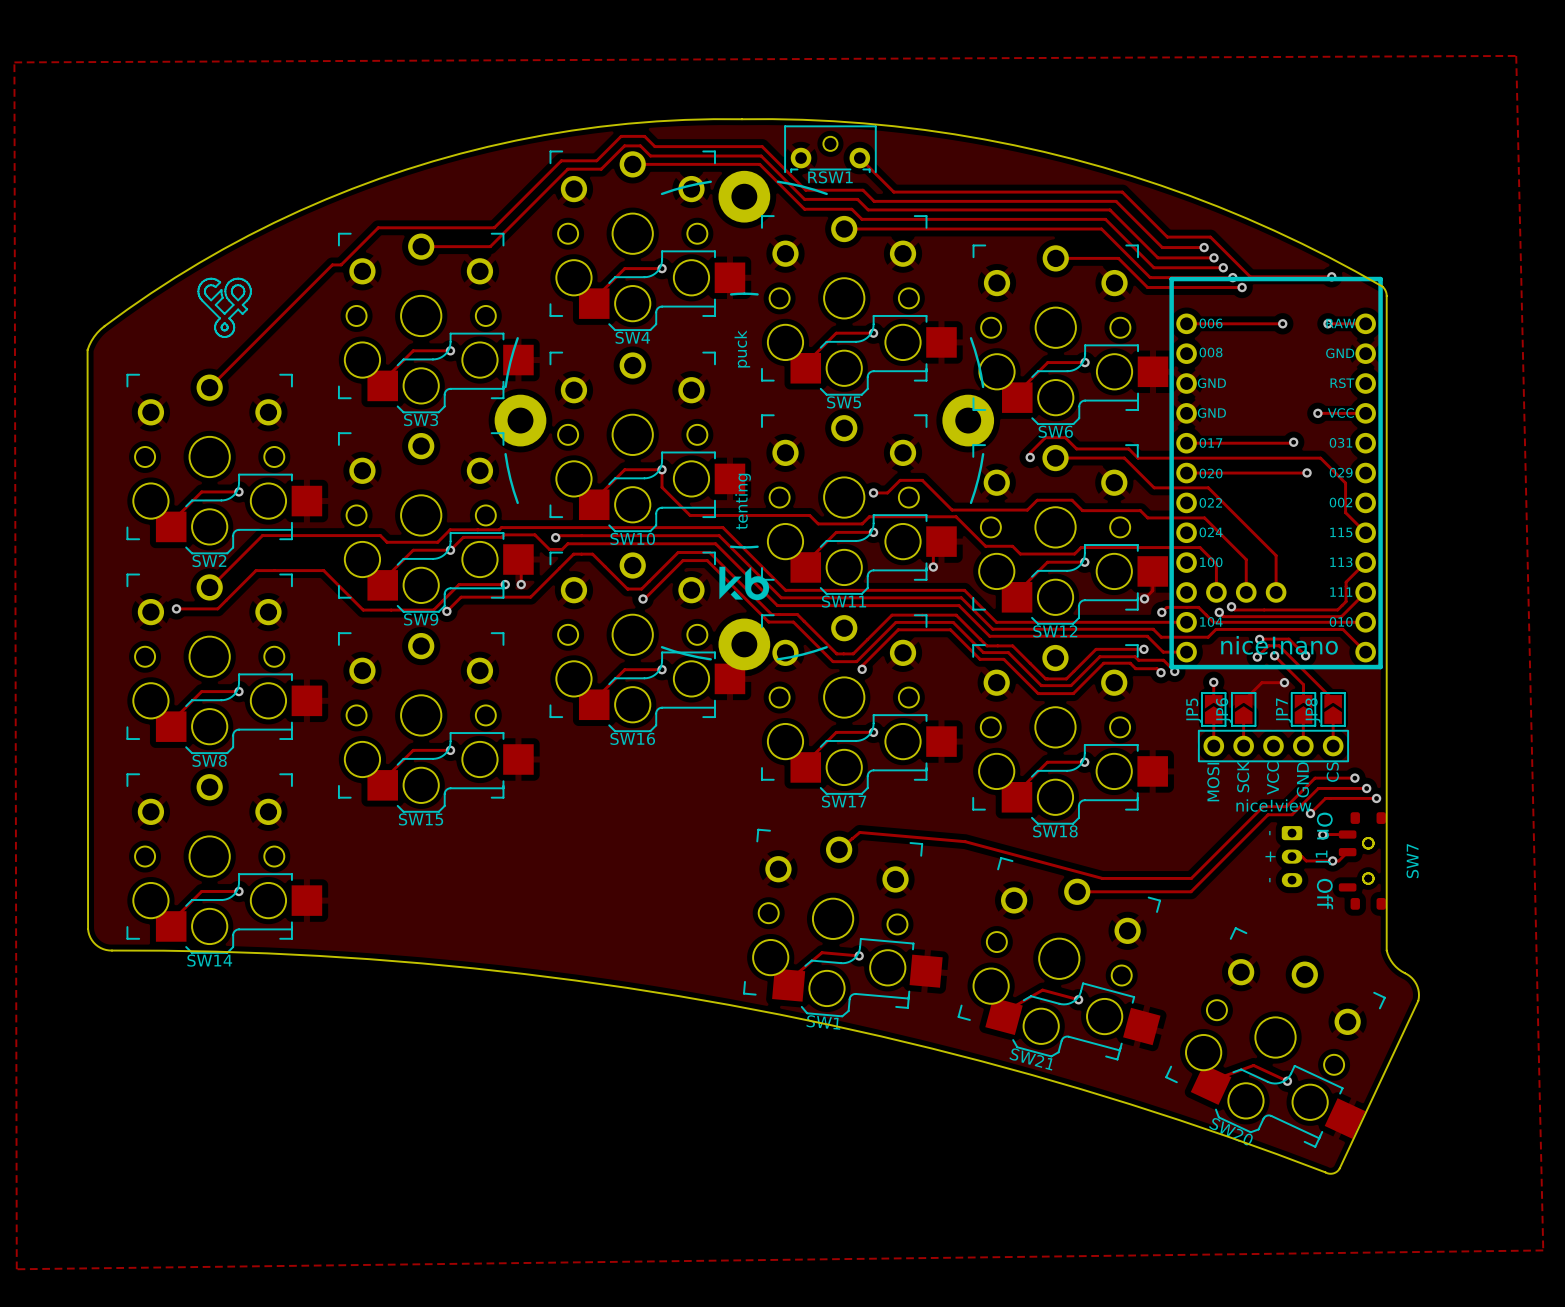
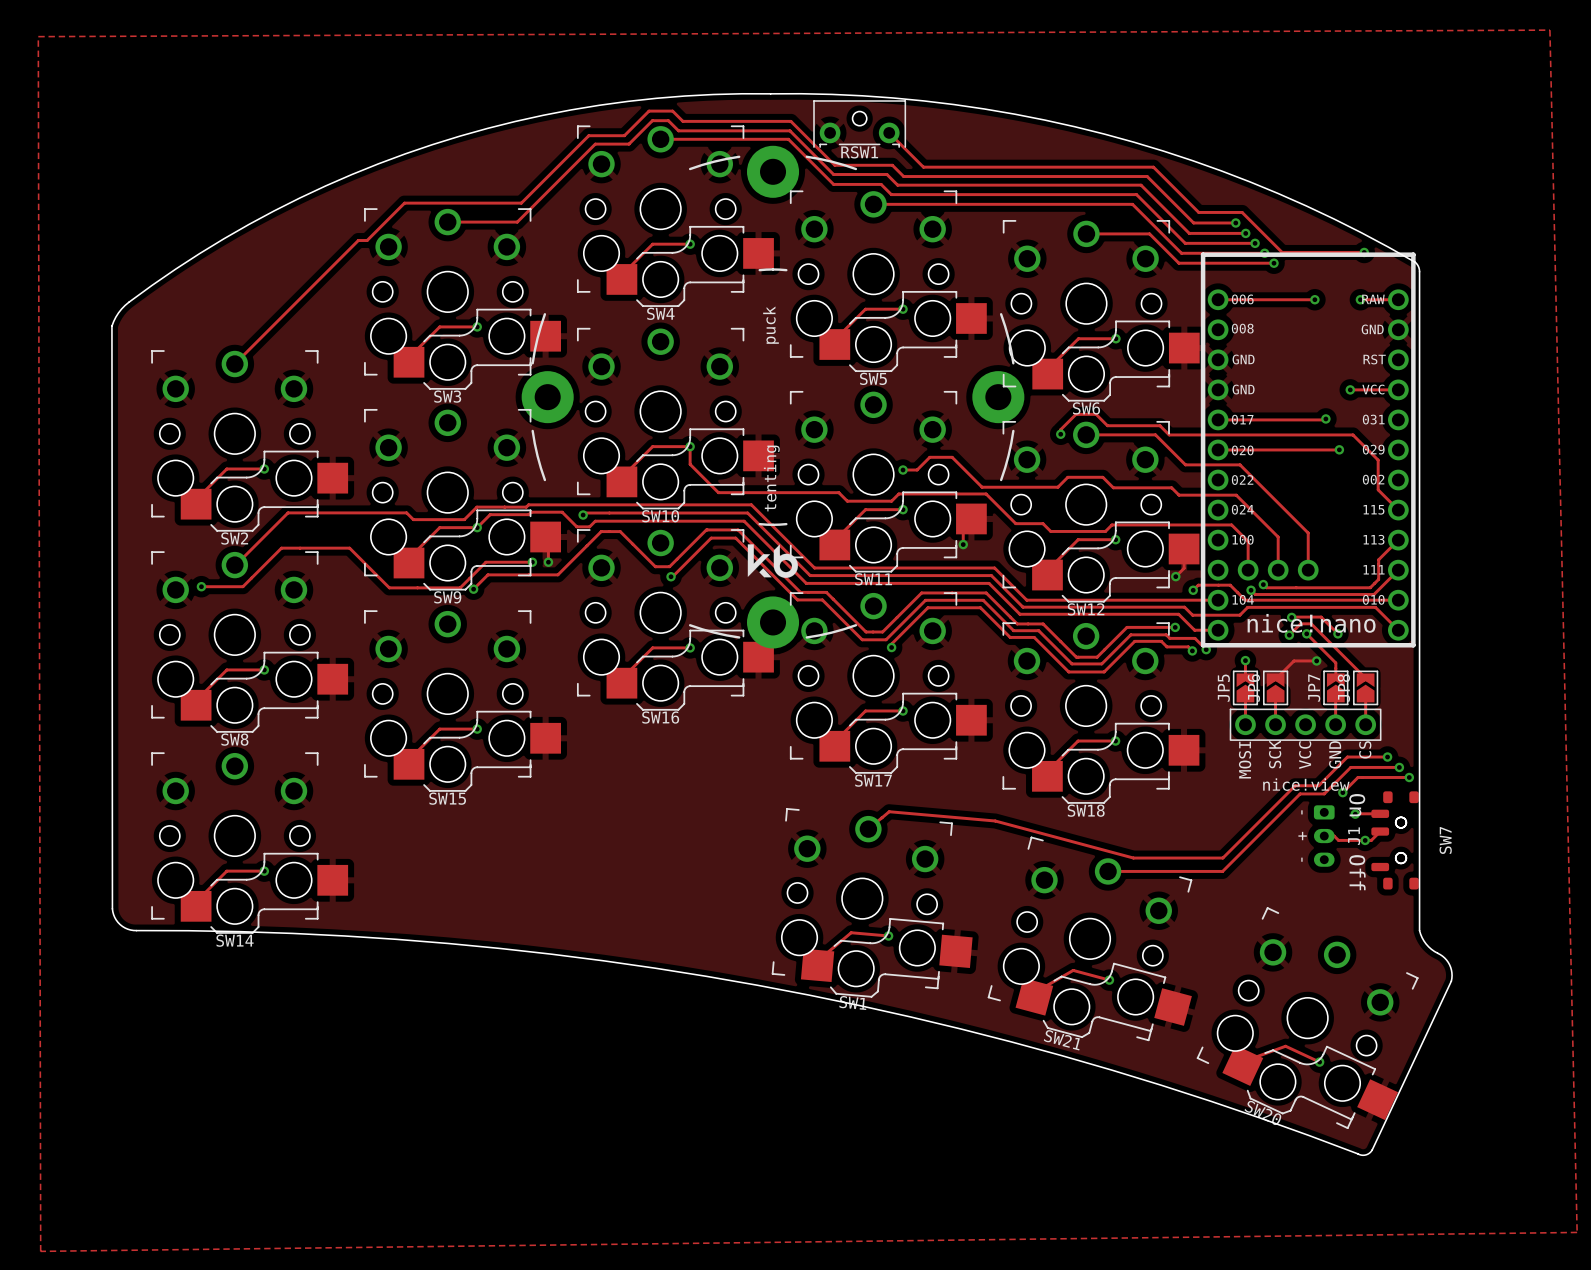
drawing: [198, 278, 252, 338] -> none

